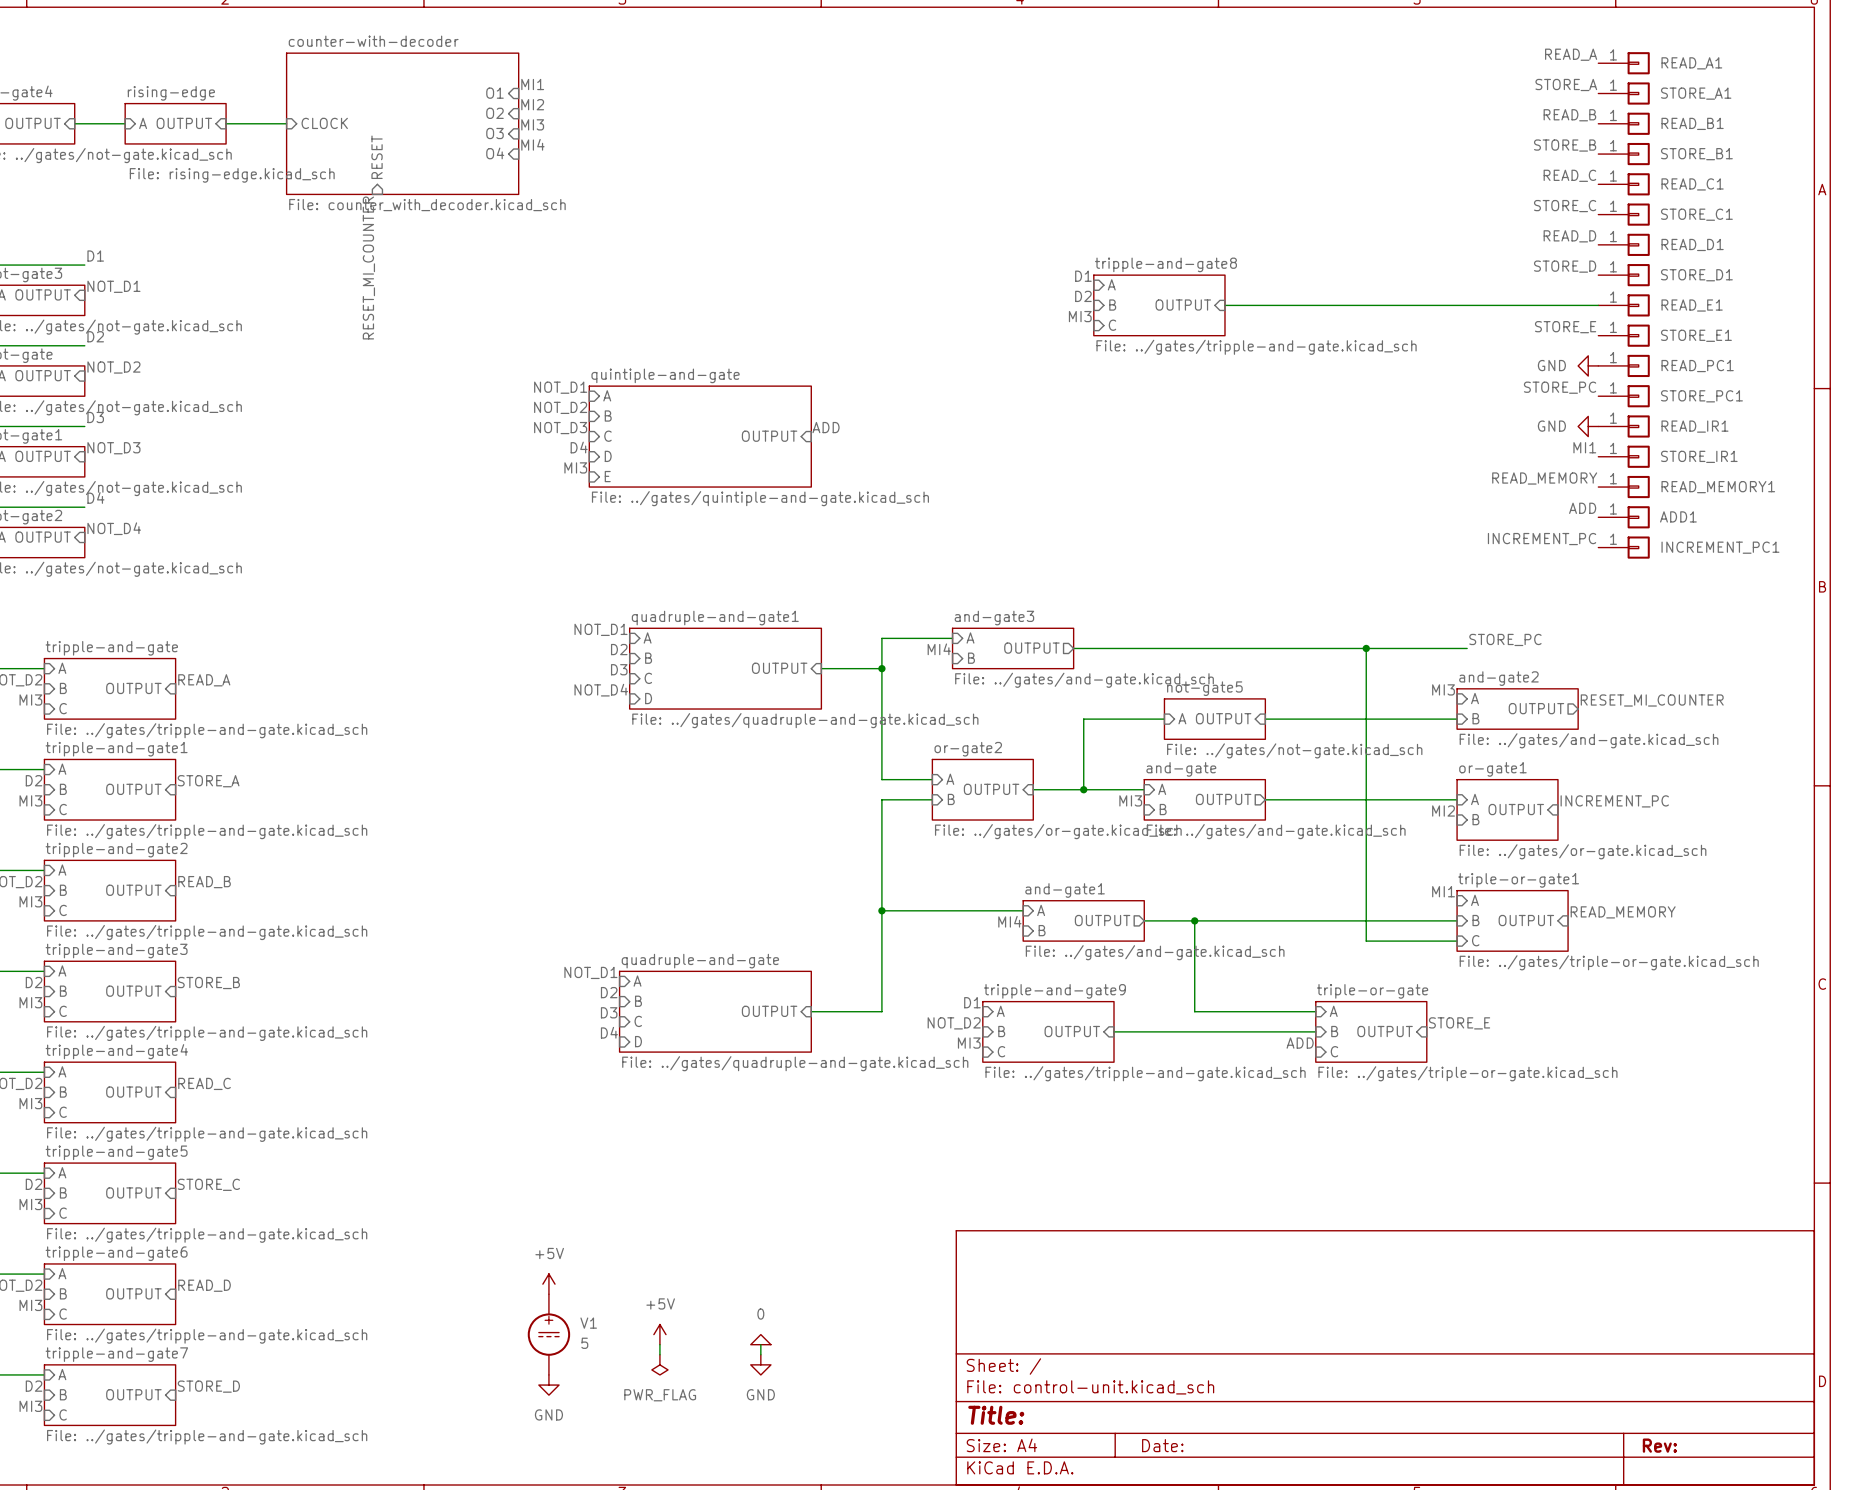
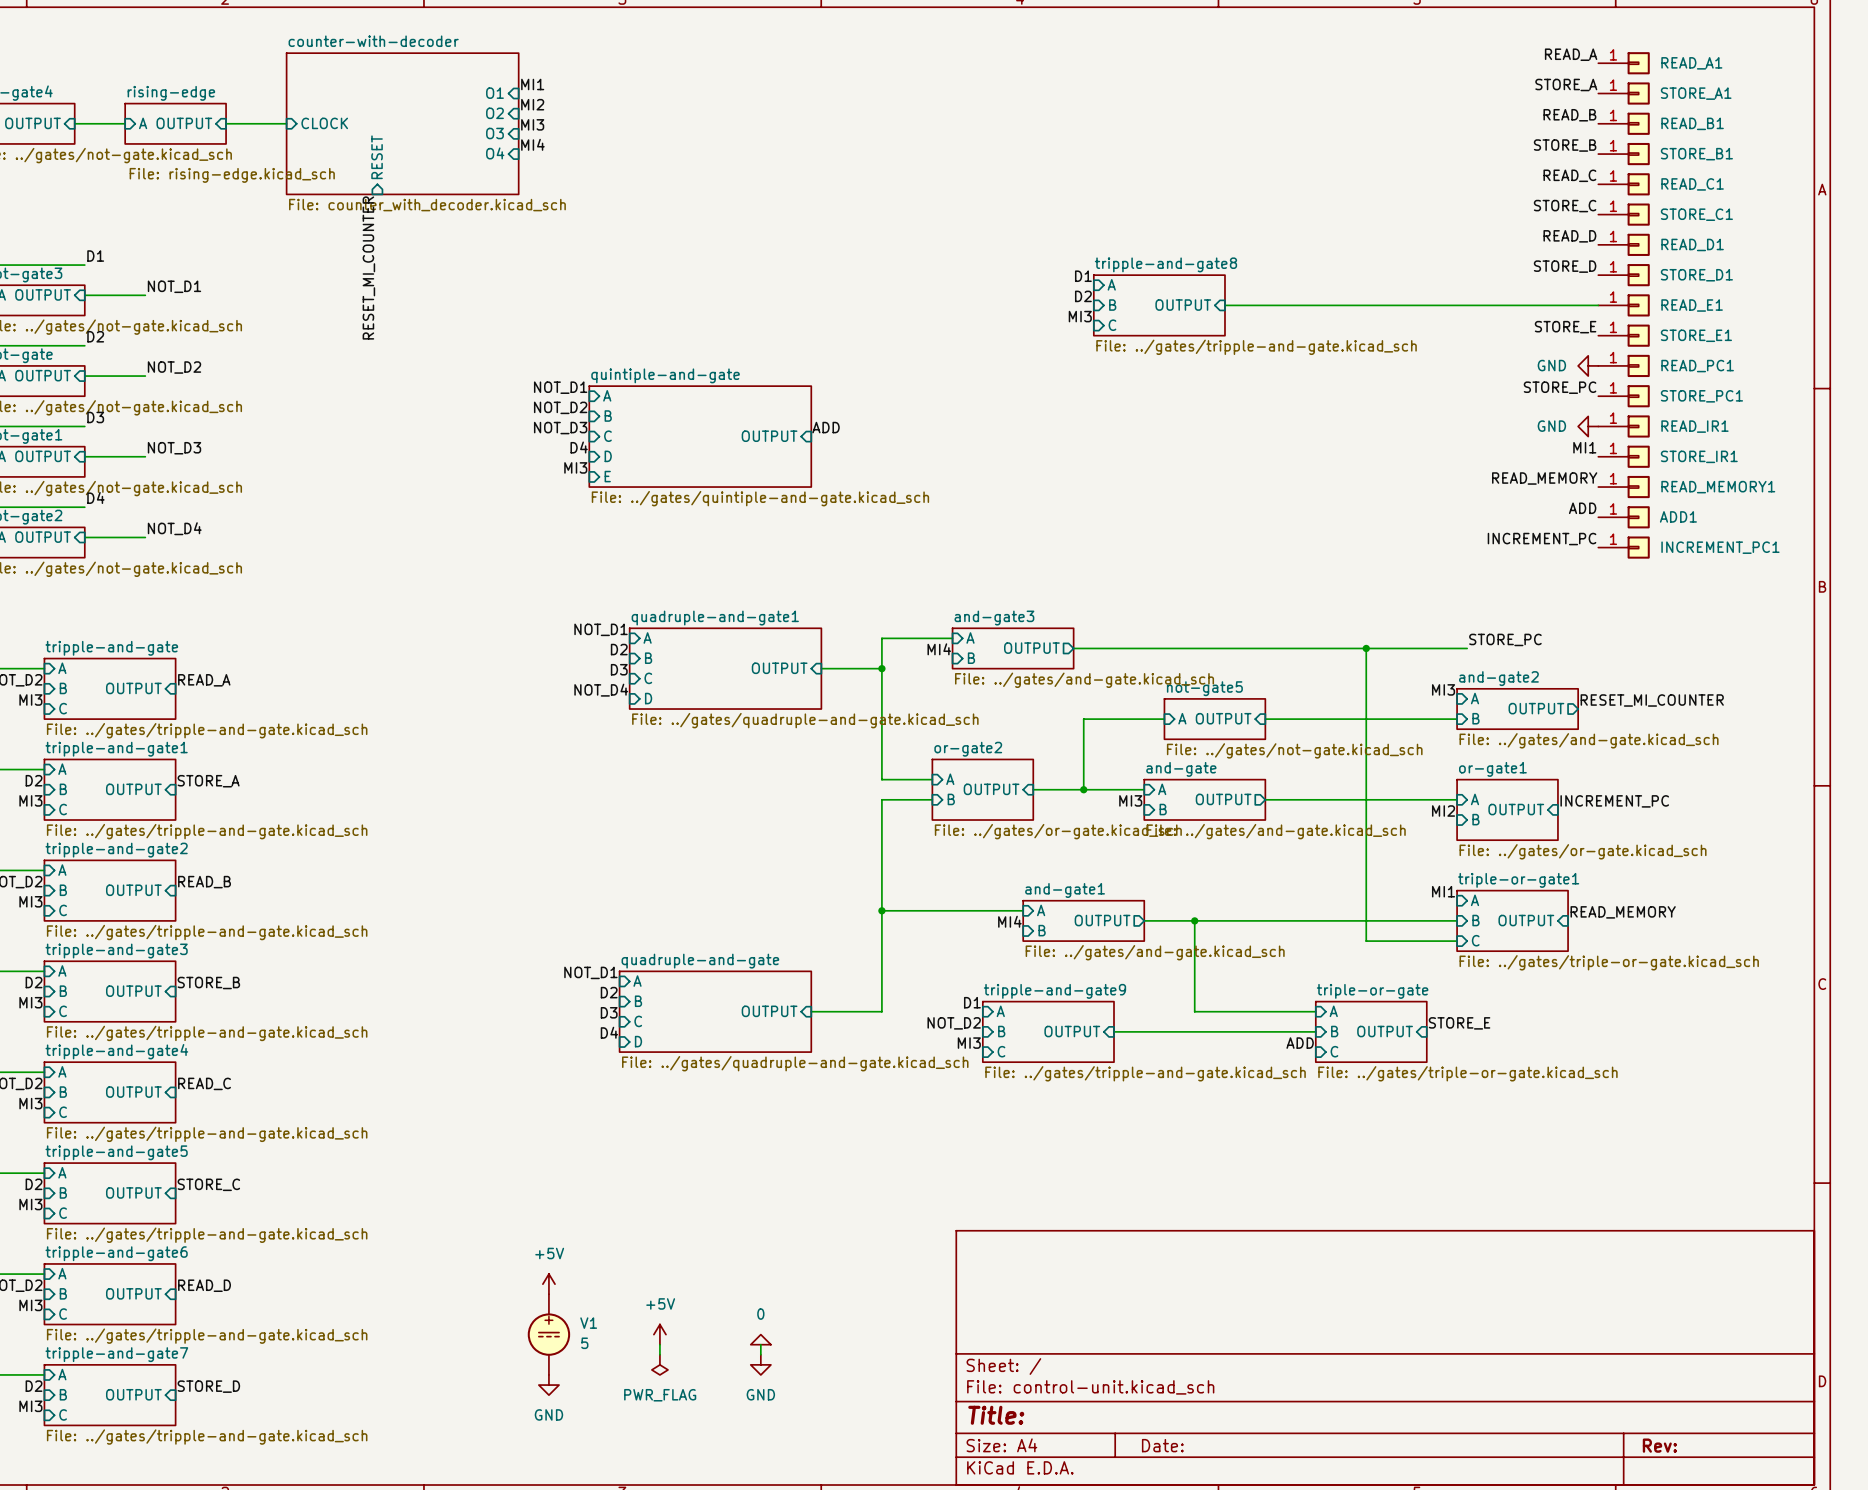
label position: NOT_D1 (113, 286) -> NOT_D1 (174, 286)
wire: none -> (84, 295) (145, 295)
label position: NOT_D2 (113, 367) -> NOT_D2 (174, 367)
wire: none -> (84, 376) (145, 376)
label position: NOT_D3 (113, 448) -> NOT_D3 (174, 448)
wire: none -> (84, 456) (145, 456)
label position: NOT_D4 (114, 528) -> NOT_D4 (174, 528)
wire: none -> (84, 537) (145, 537)

